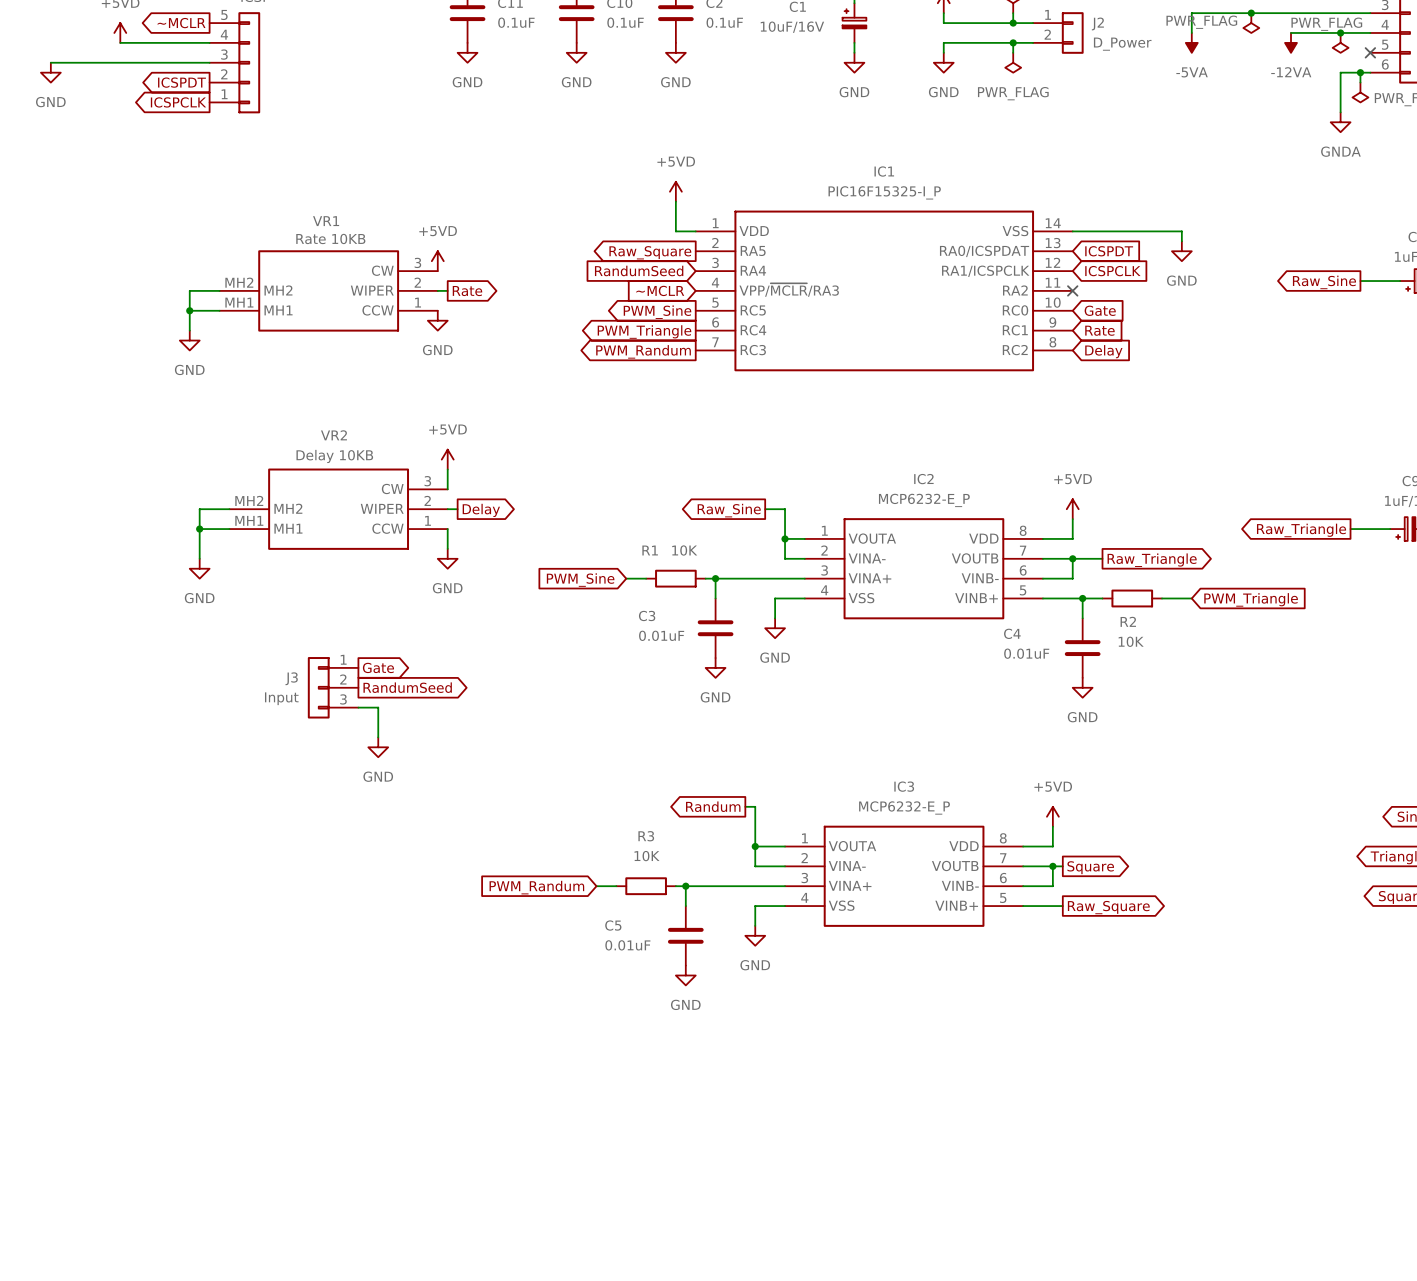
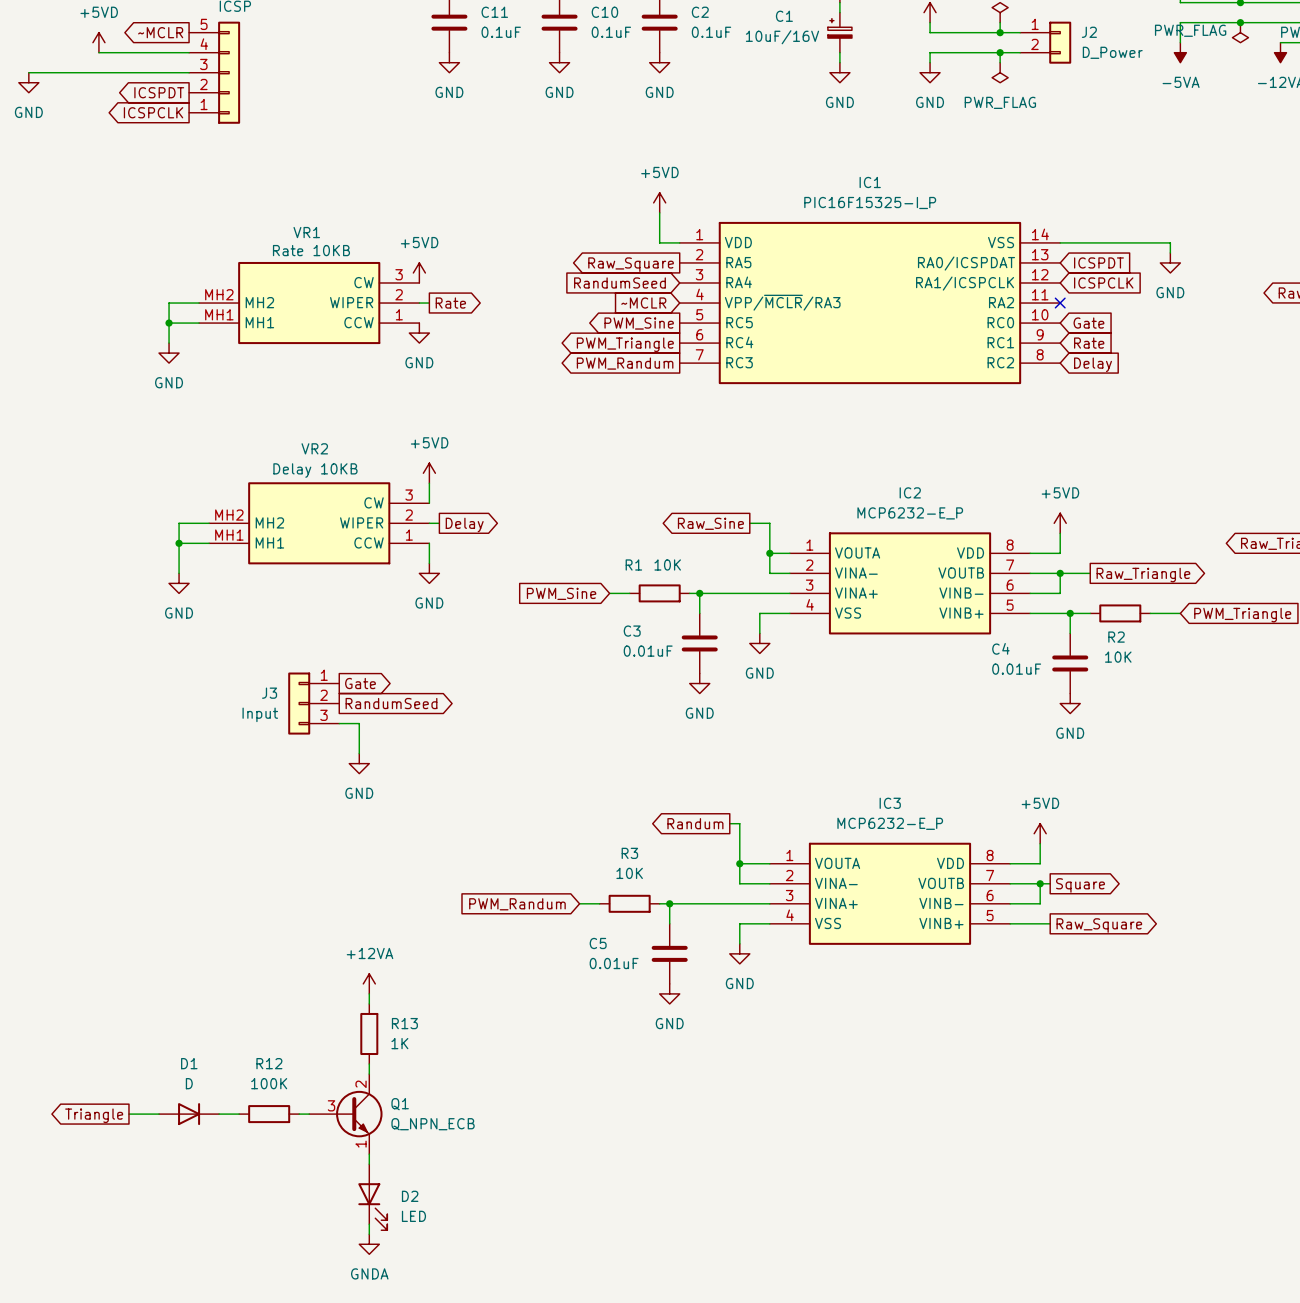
power symbol: none -> +12VA (369, 983)
wire: none -> (369, 993) (369, 1003)
R13: none -> 1K (369, 1033)
wire: none -> (369, 1064) (369, 1074)
wire: none -> (128, 1114) (159, 1114)
D1: none -> D (189, 1114)
wire: none -> (219, 1114) (239, 1114)
R12: none -> 100K (269, 1114)
wire: none -> (299, 1114) (309, 1114)
Q1: none -> Q_NPN_ECB (345, 1114)
global label: none -> Triangle (94, 1115)
wire: none -> (369, 1154) (369, 1164)
D2: none -> LED (372, 1197)
wire: none -> (369, 1224) (369, 1234)
power symbol: none -> GNDA (369, 1244)

